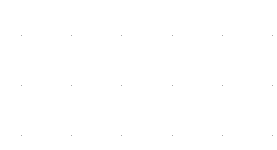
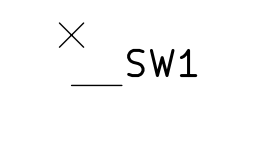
no-connect mark: none -> (71, 35)
label: none -> SW1 (162, 62)
wire: none -> (71, 85) (121, 85)

